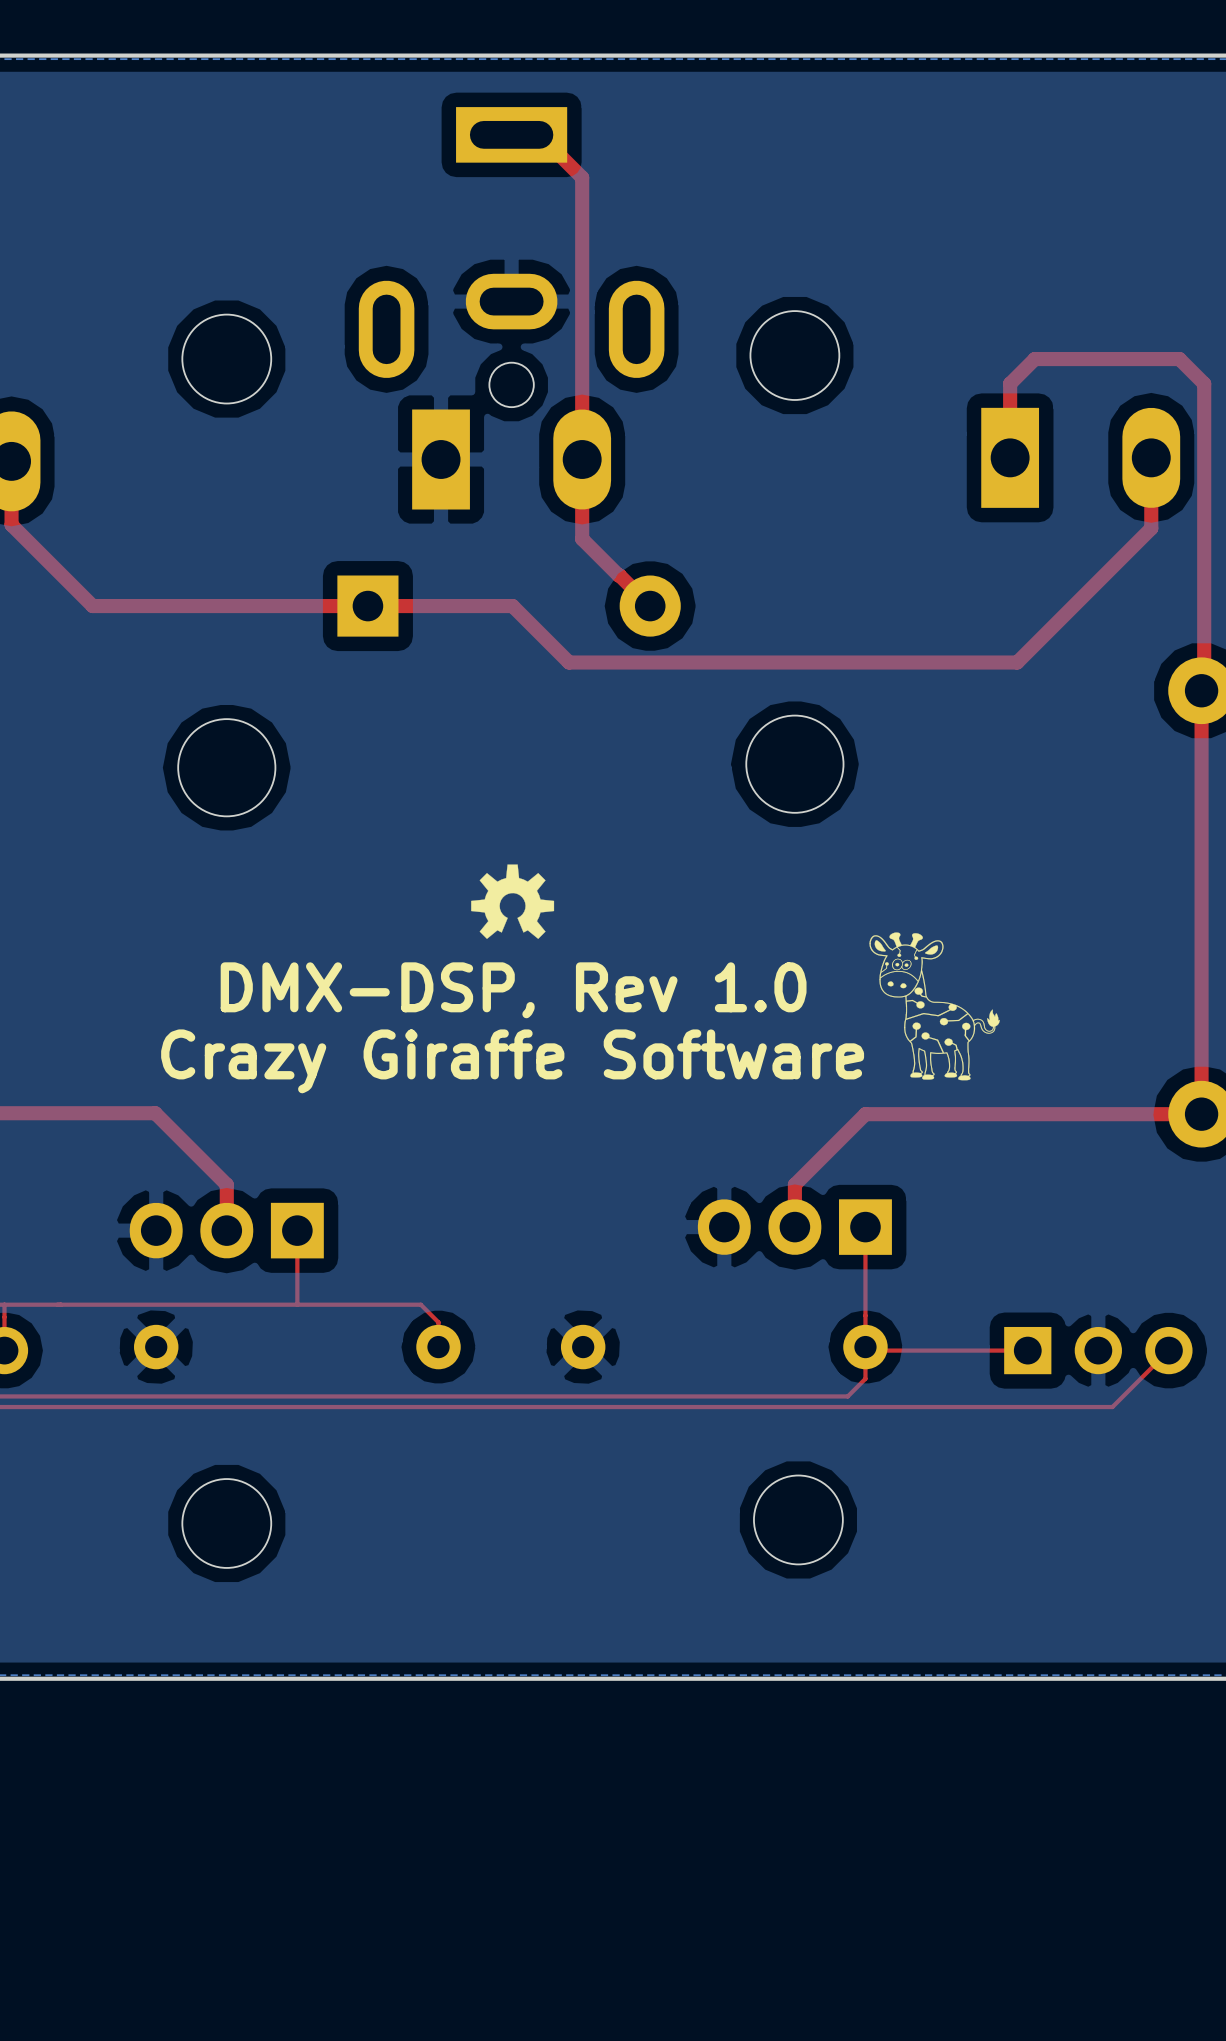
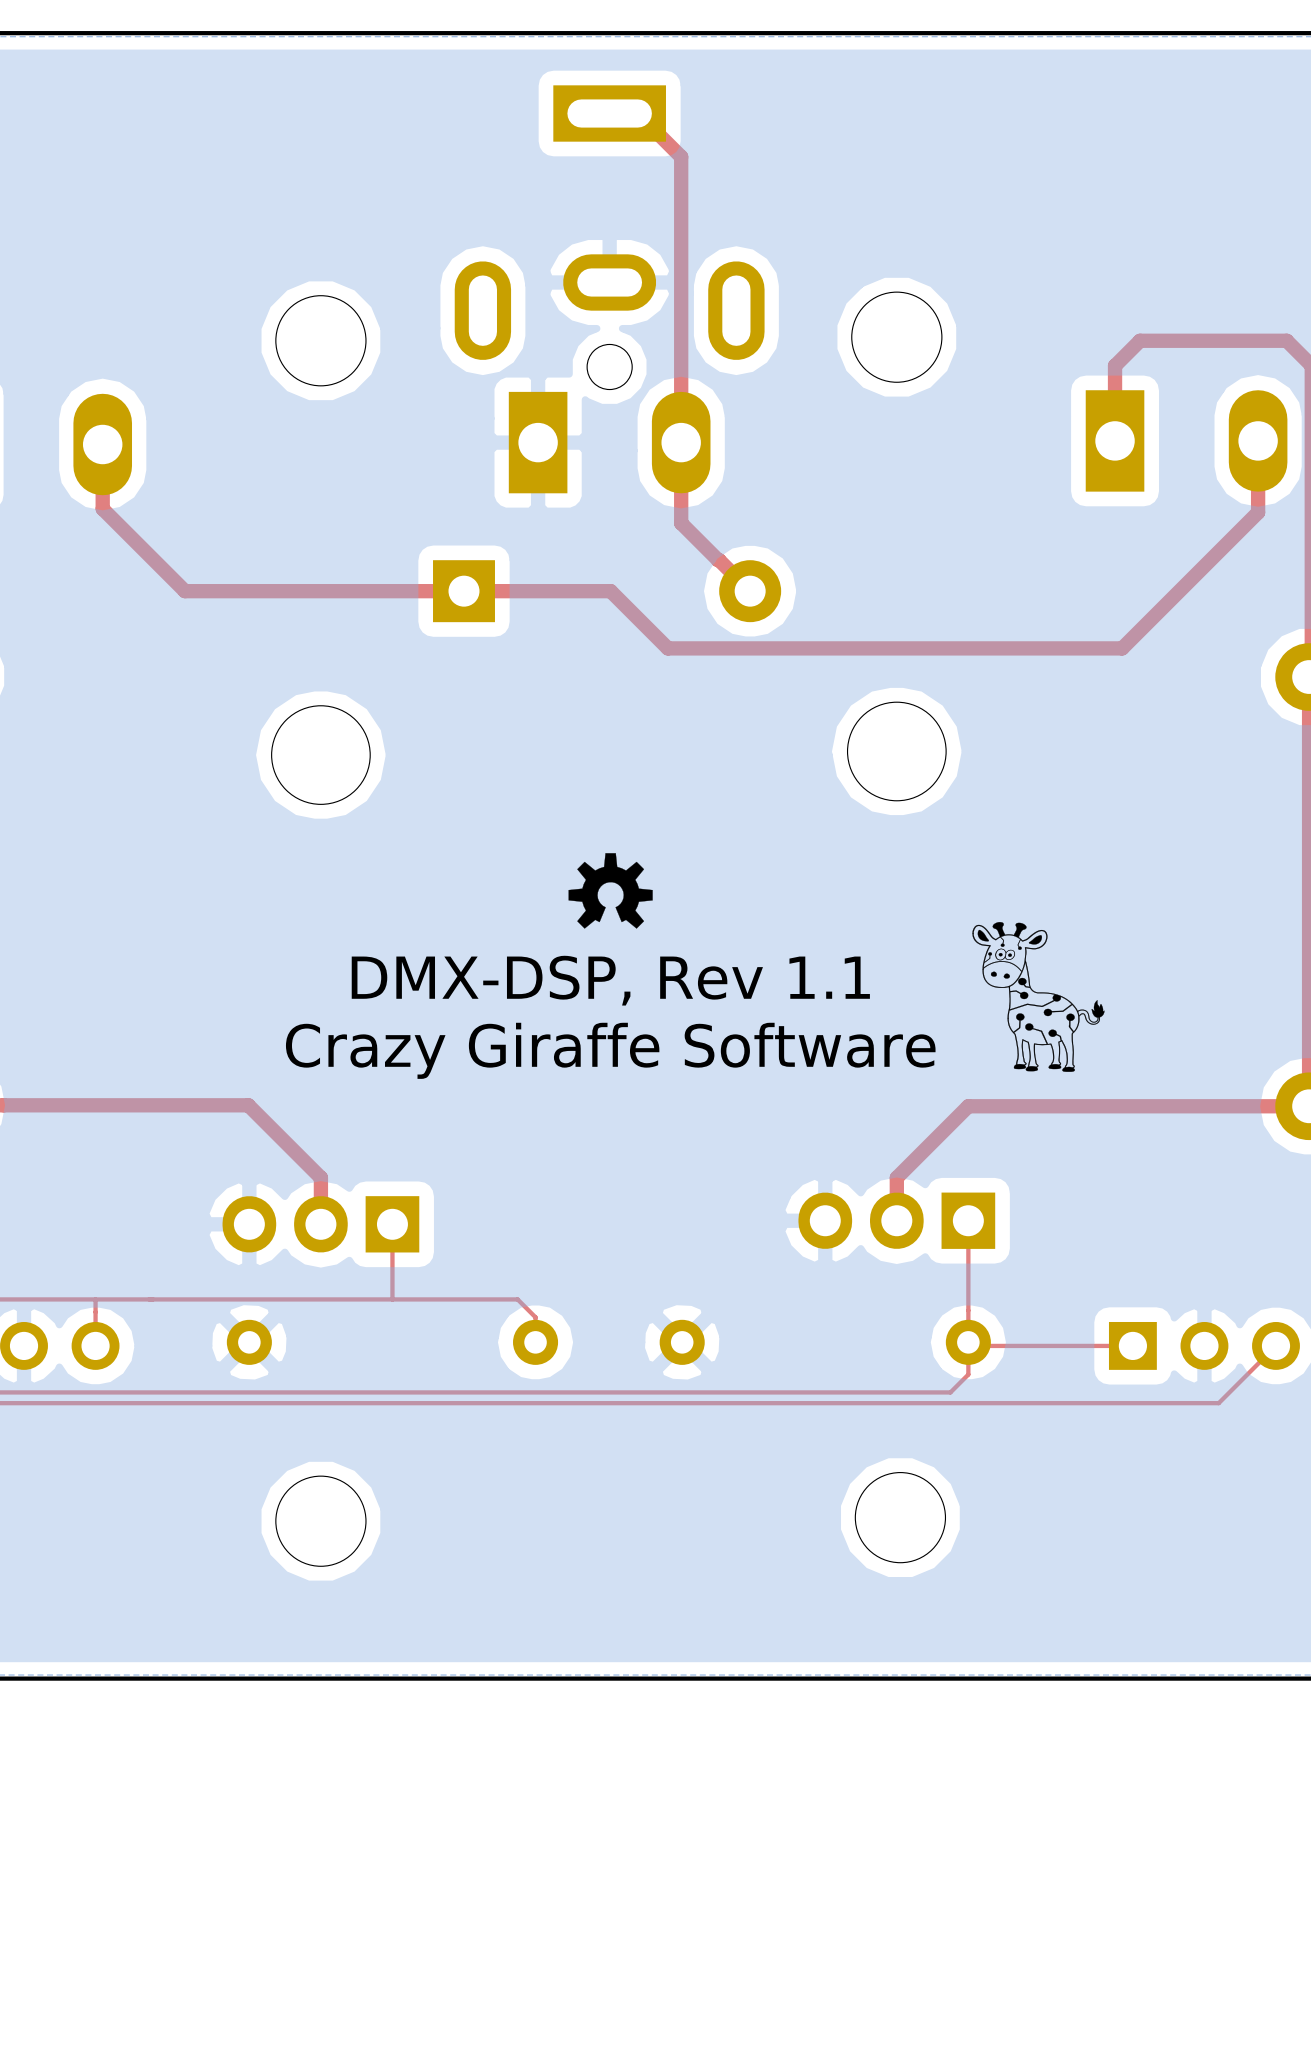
text: DMX-DSP, Rev 1.0 (513, 990) -> DMX-DSP, Rev 1.1 (610, 980)

